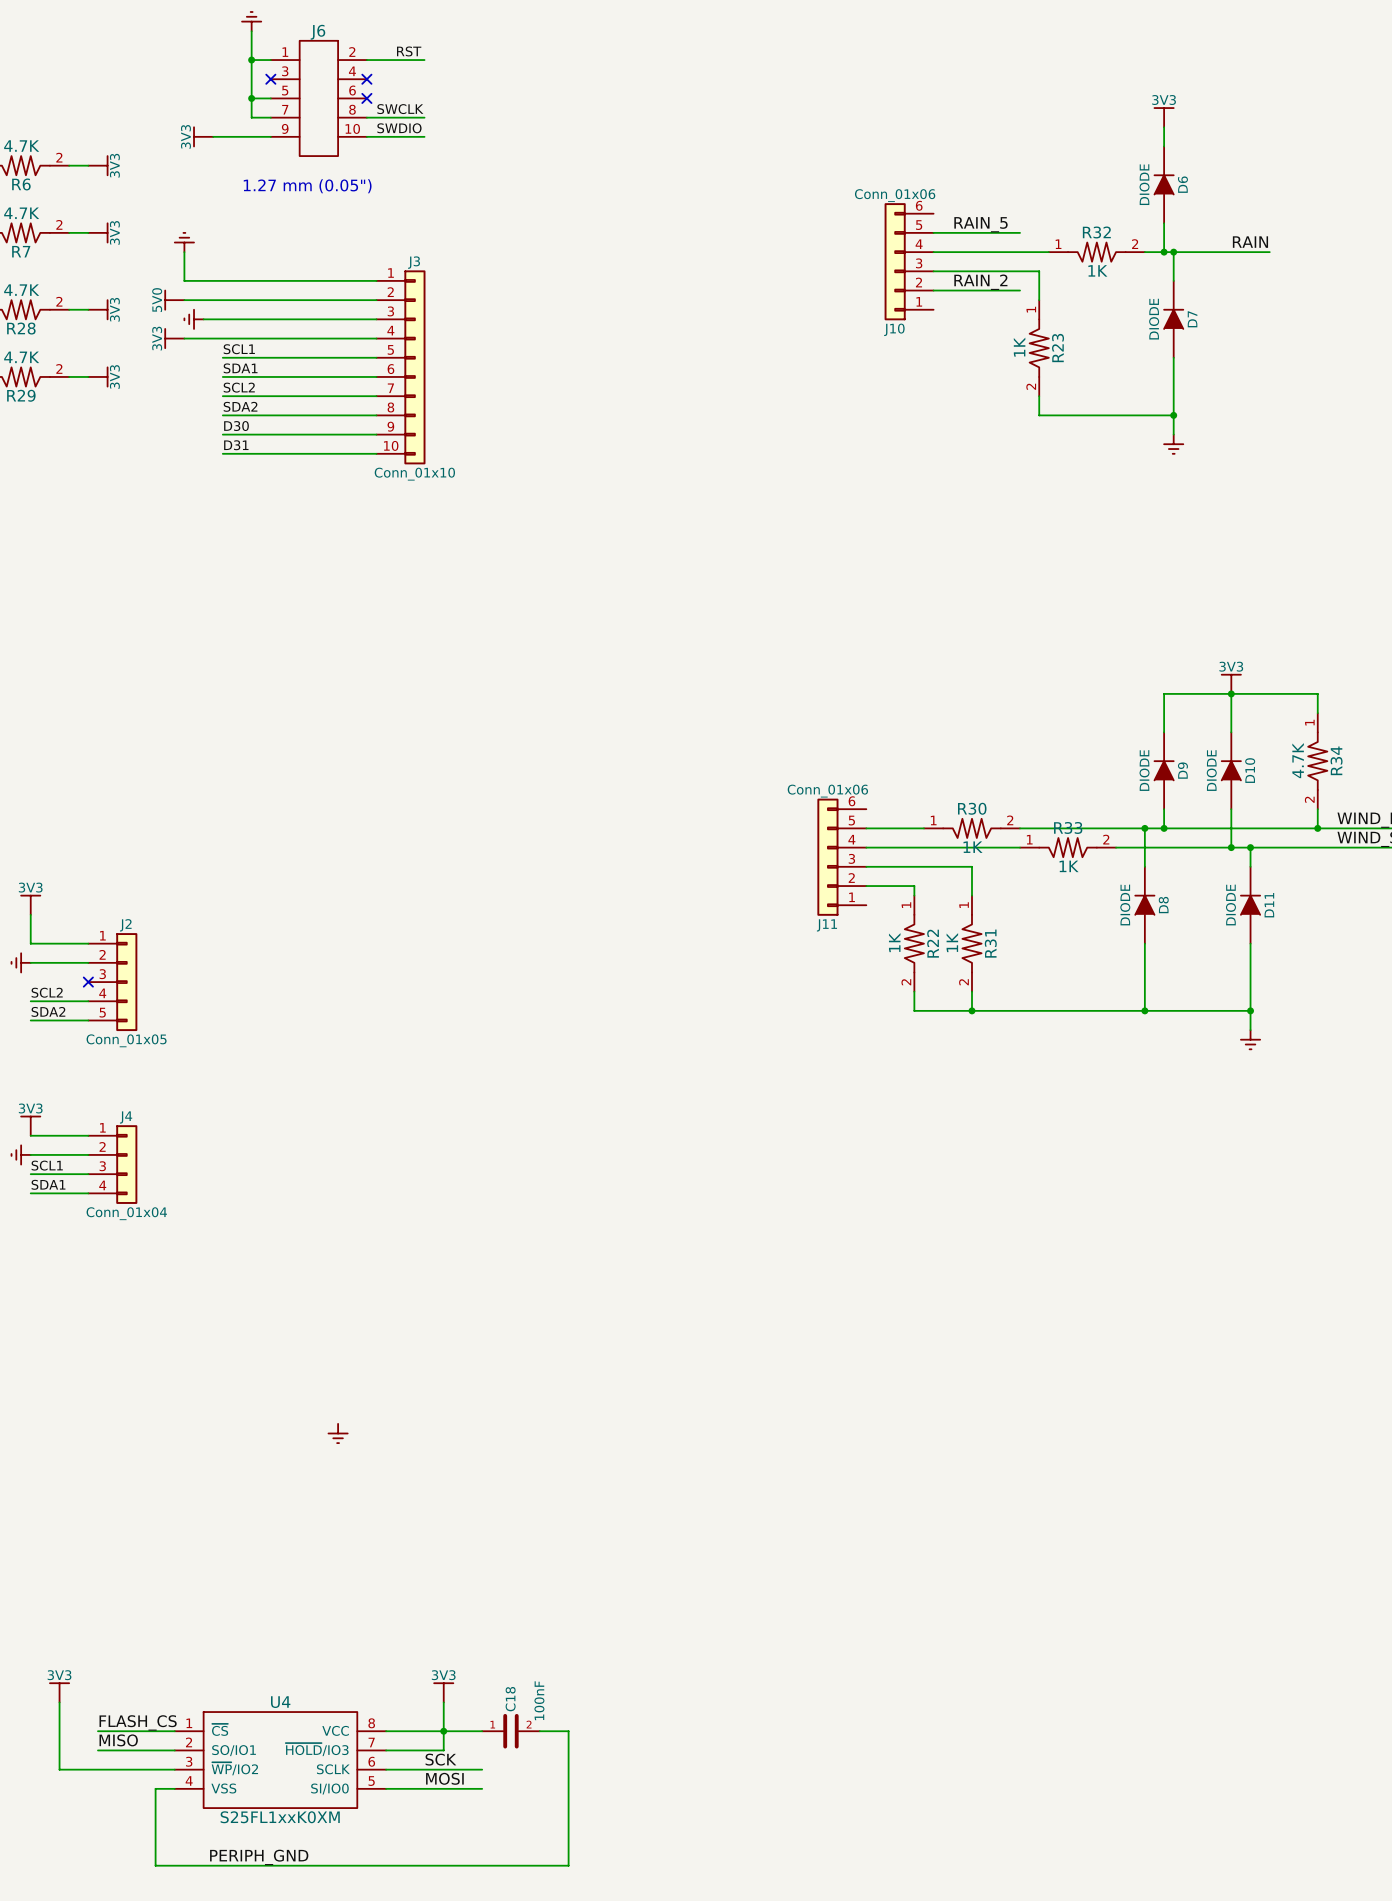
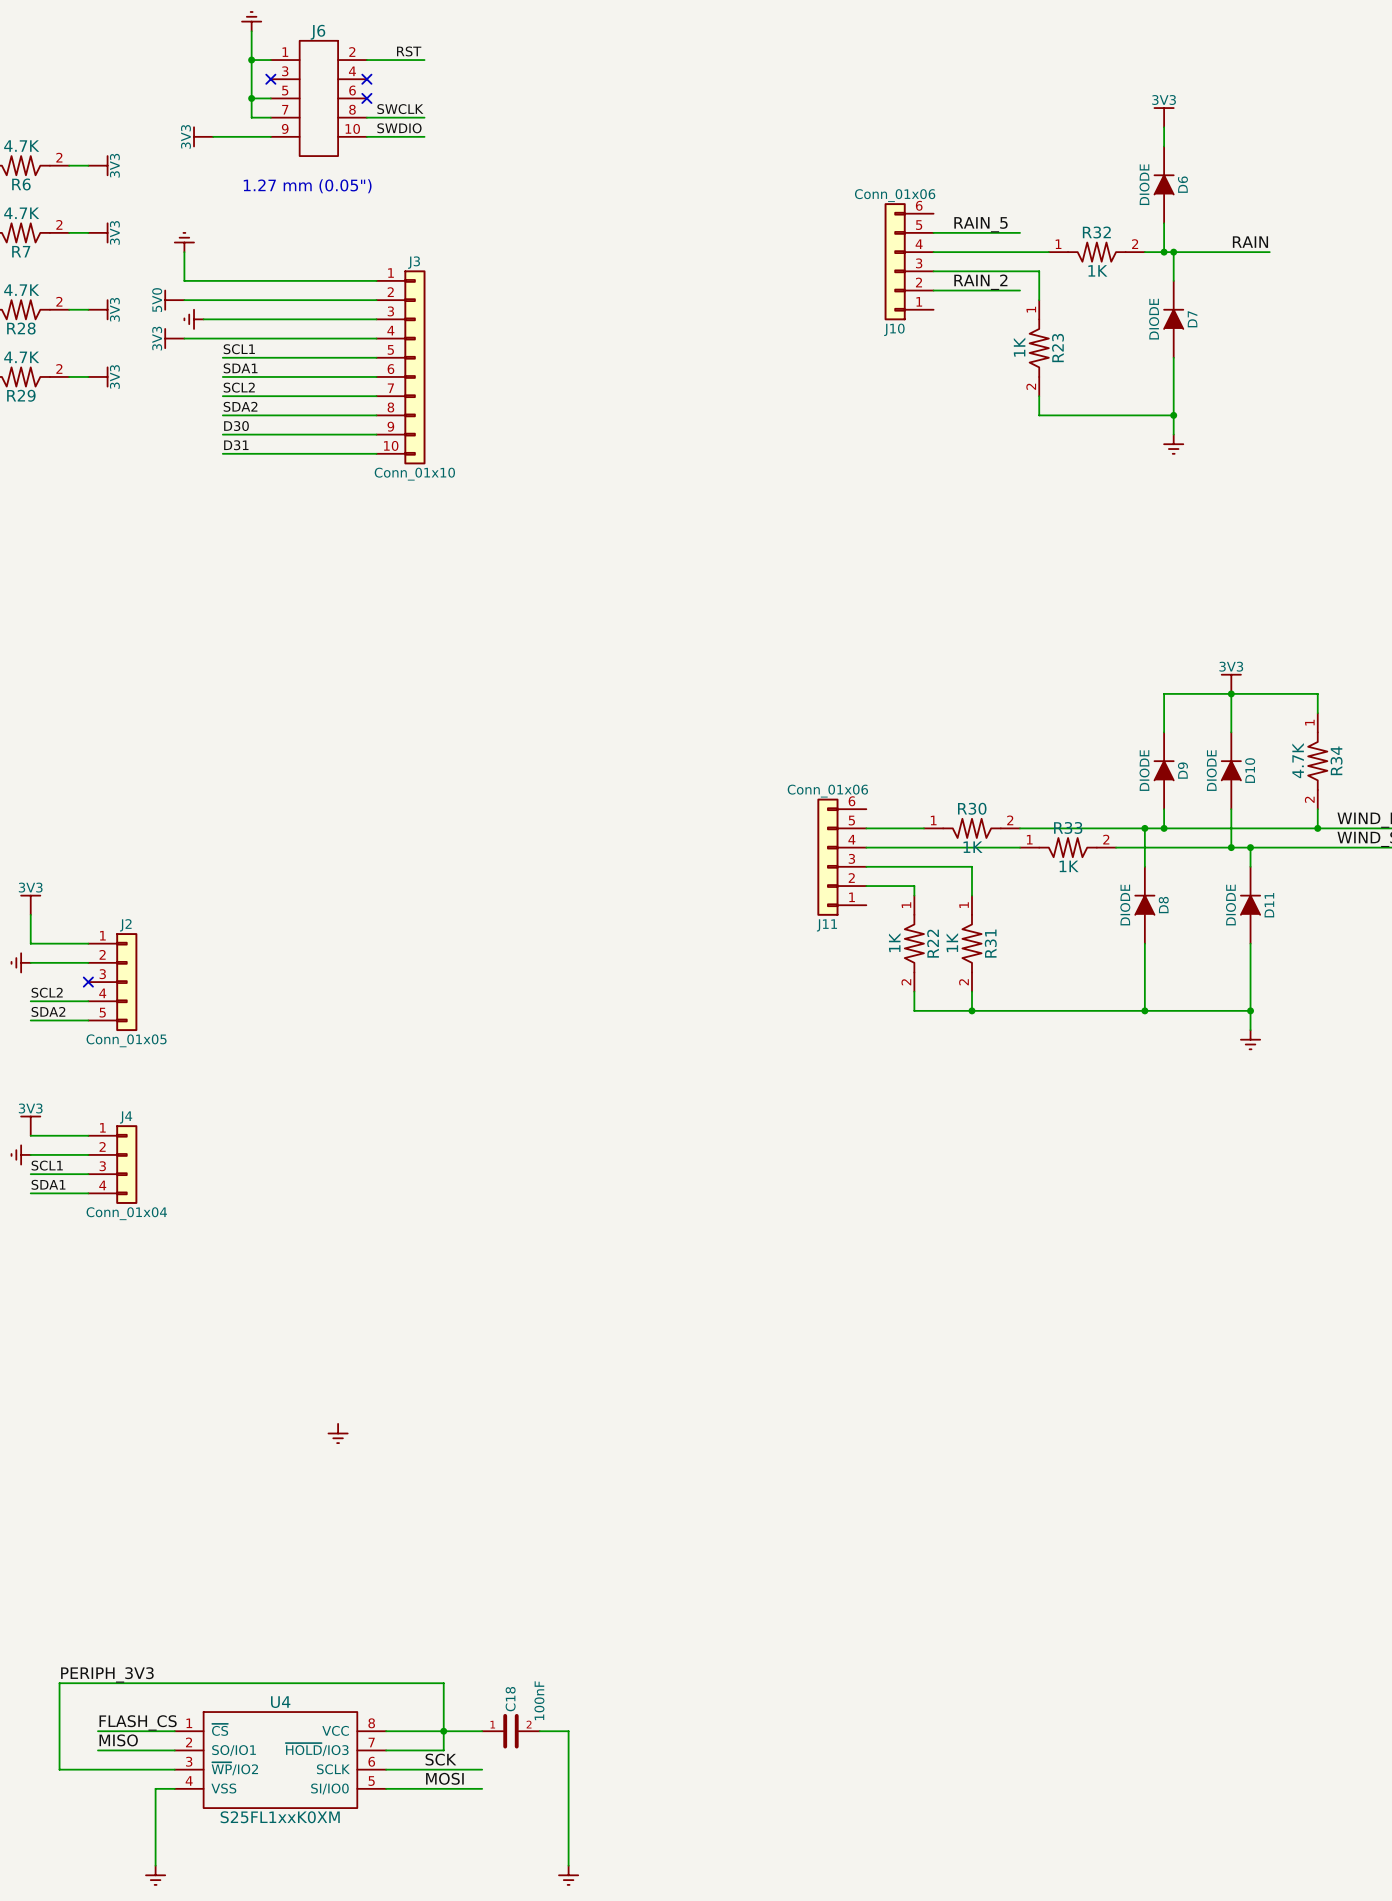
label: none -> PERIPH_3V3 (107, 1674)
power symbol: 3V3 (59, 1692) -> none
power symbol: 3V3 (443, 1692) -> none
wire: none -> (59, 1702) (59, 1683) (443, 1683) (443, 1702)
label: PERIPH_GND (259, 1857) -> none
wire: (155, 1865) (568, 1865) -> none
power symbol: none -> (155, 1875)
power symbol: none -> (568, 1875)

